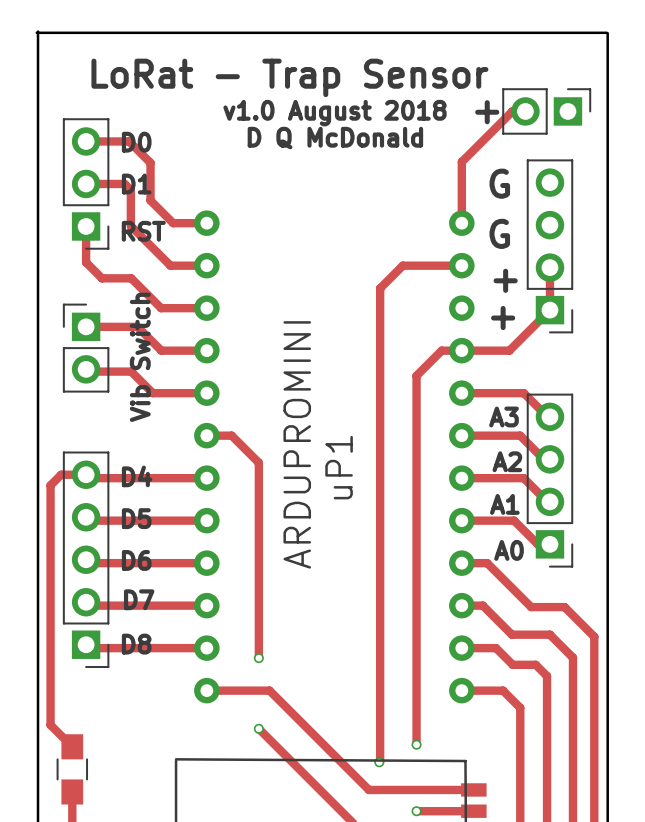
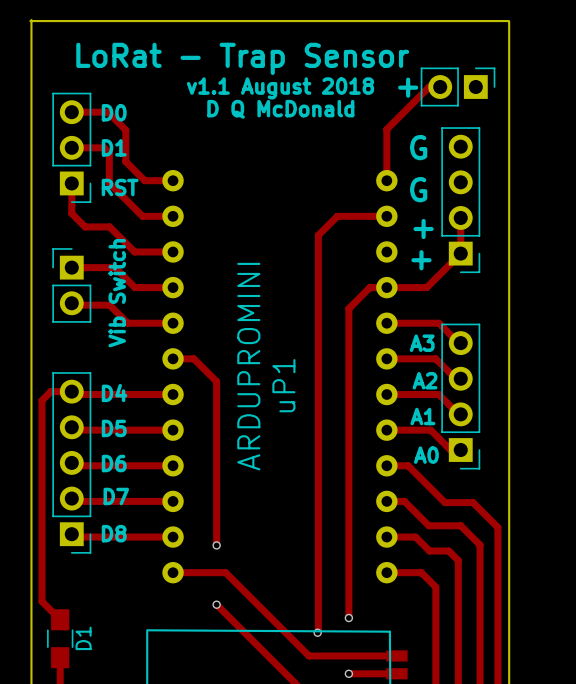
text: v1.0 August 2018 (335, 113) -> v1.1 August 2018 (280, 88)
D1 name: none -> D1 (83, 638)

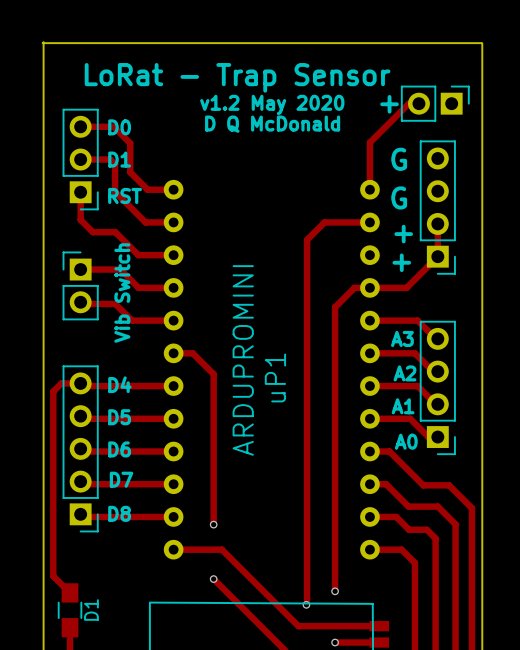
text: v1.1 August 2018 (280, 88) -> v1.2 May 2020 (272, 104)

